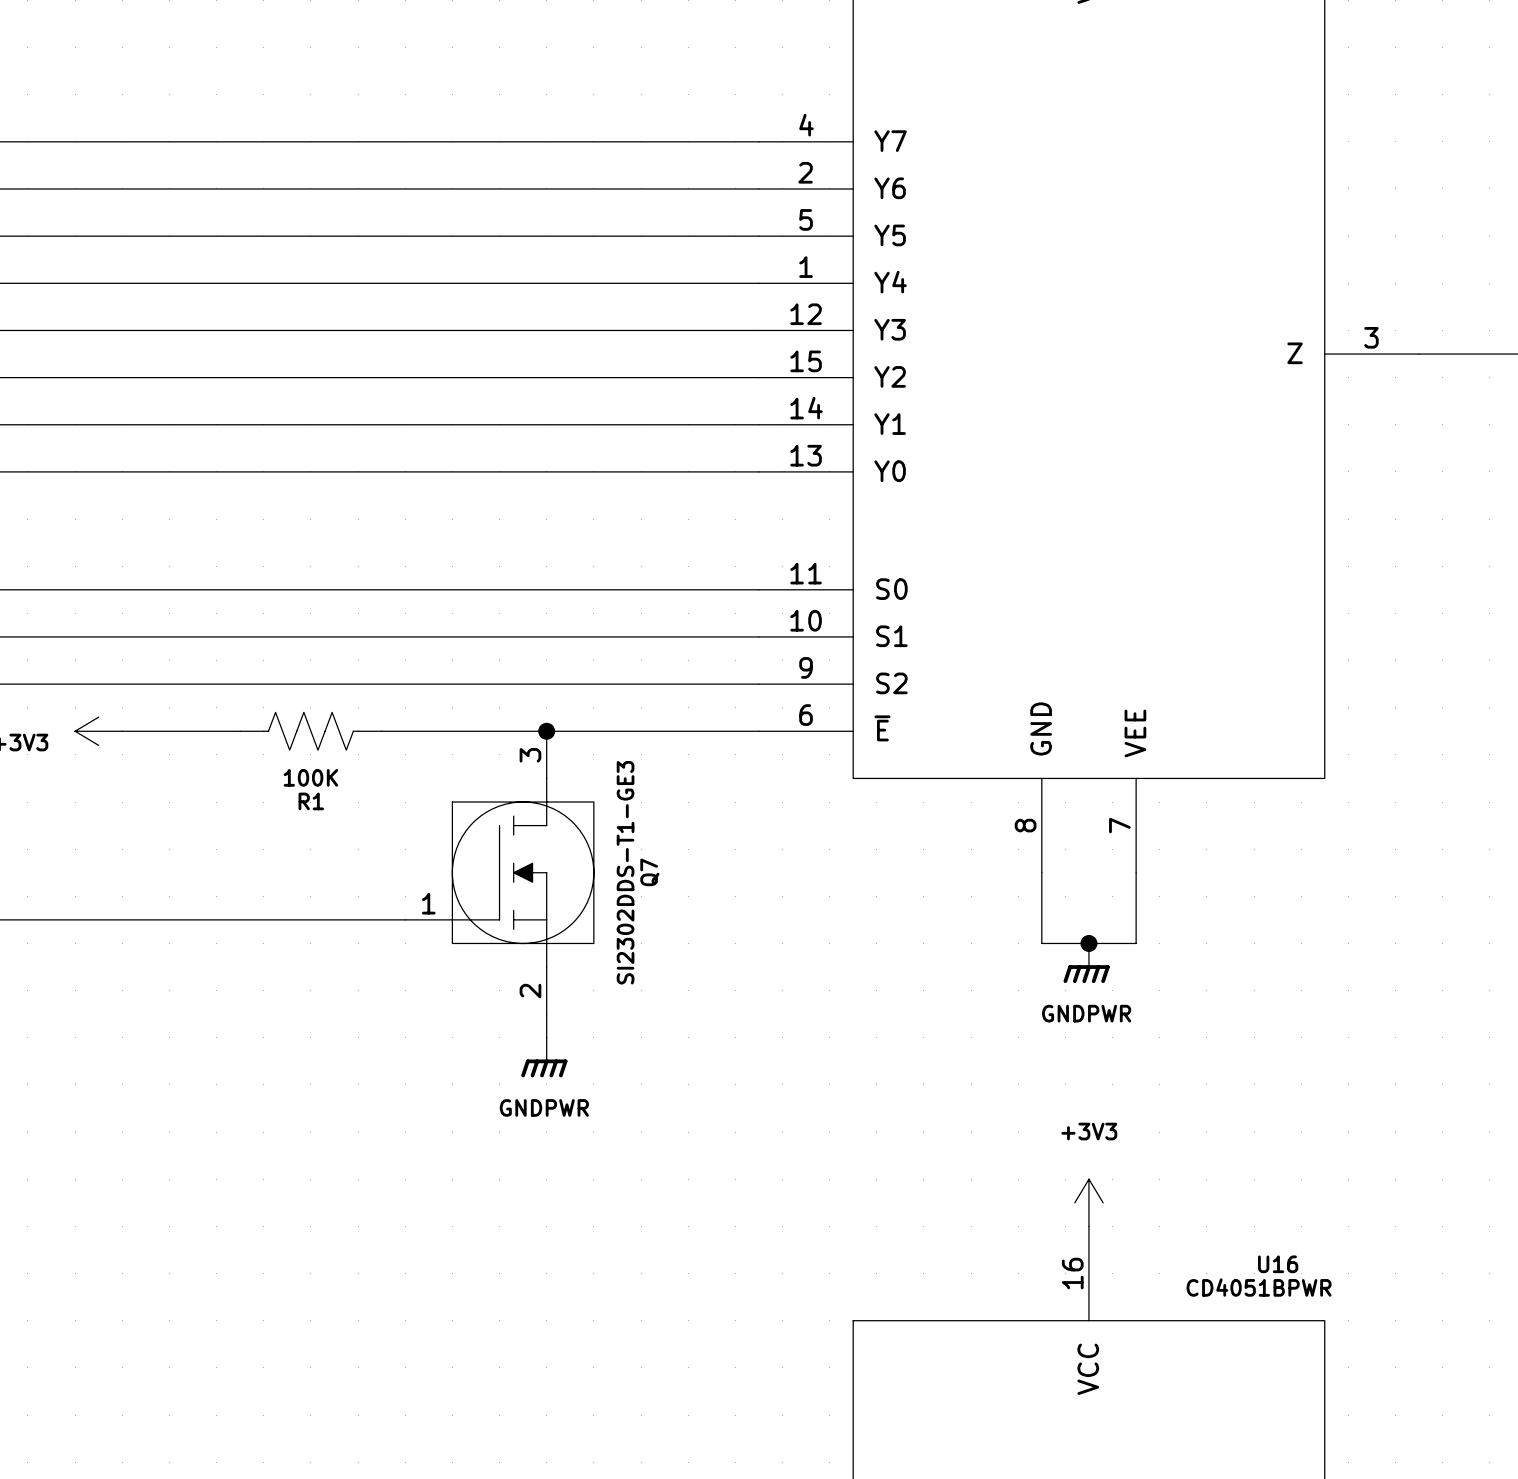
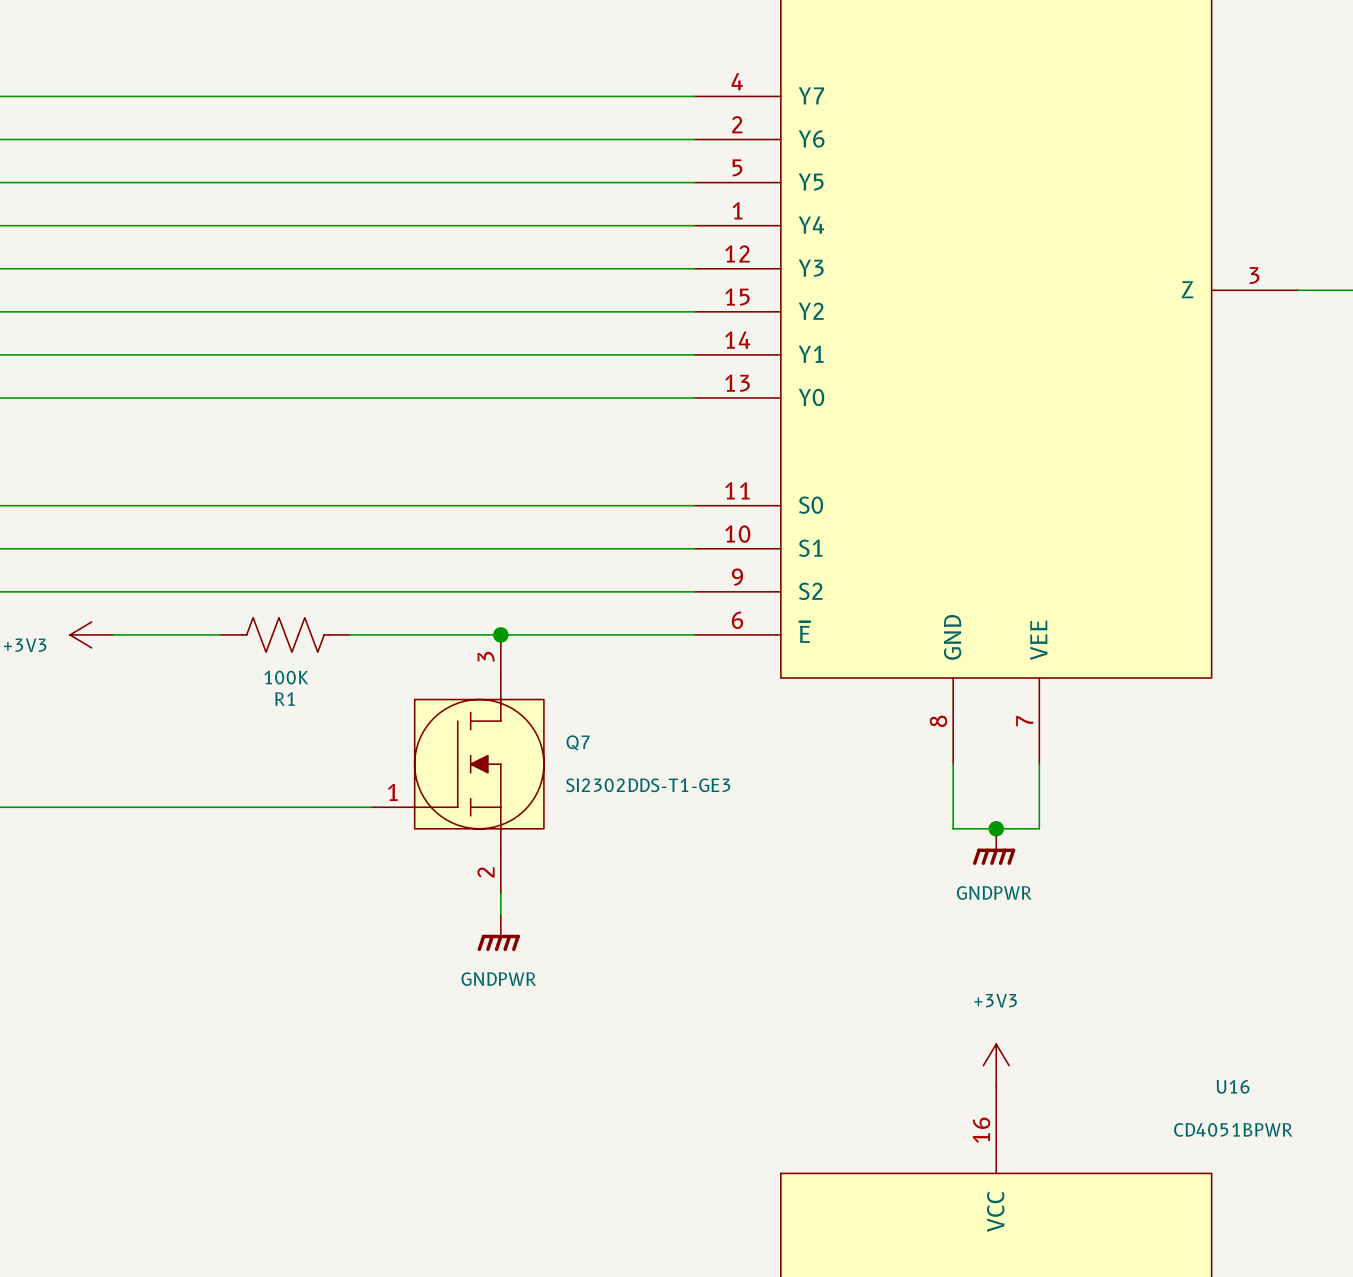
Q7 value rotation: 0° (625, 872) -> 90° clockwise (648, 785)
Q7 name rotation: 0° (649, 872) -> 90° clockwise (578, 742)
U16 name position: U16 (1278, 1264) -> U16 (1233, 1086)
U16 value position: CD4051BPWR (1259, 1287) -> CD4051BPWR (1233, 1129)

